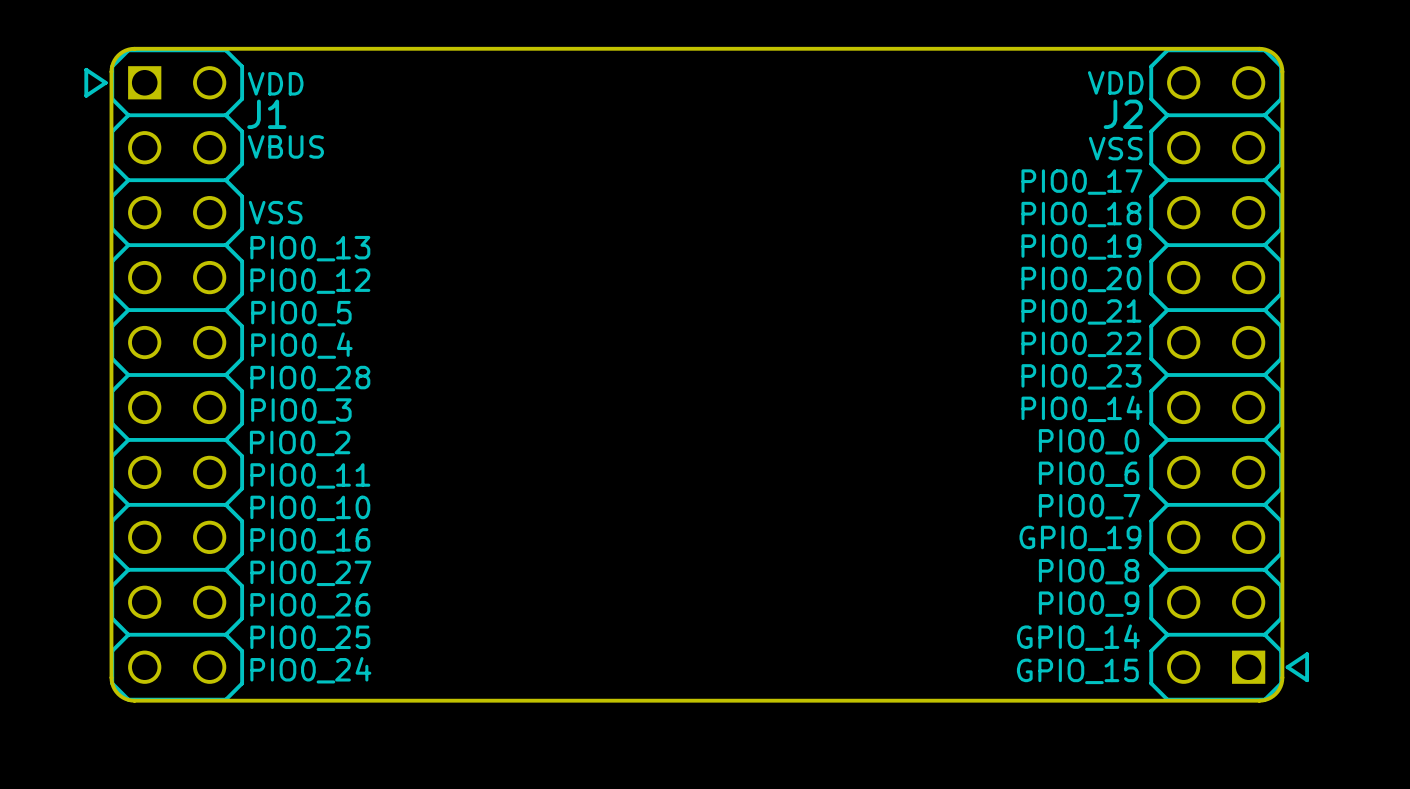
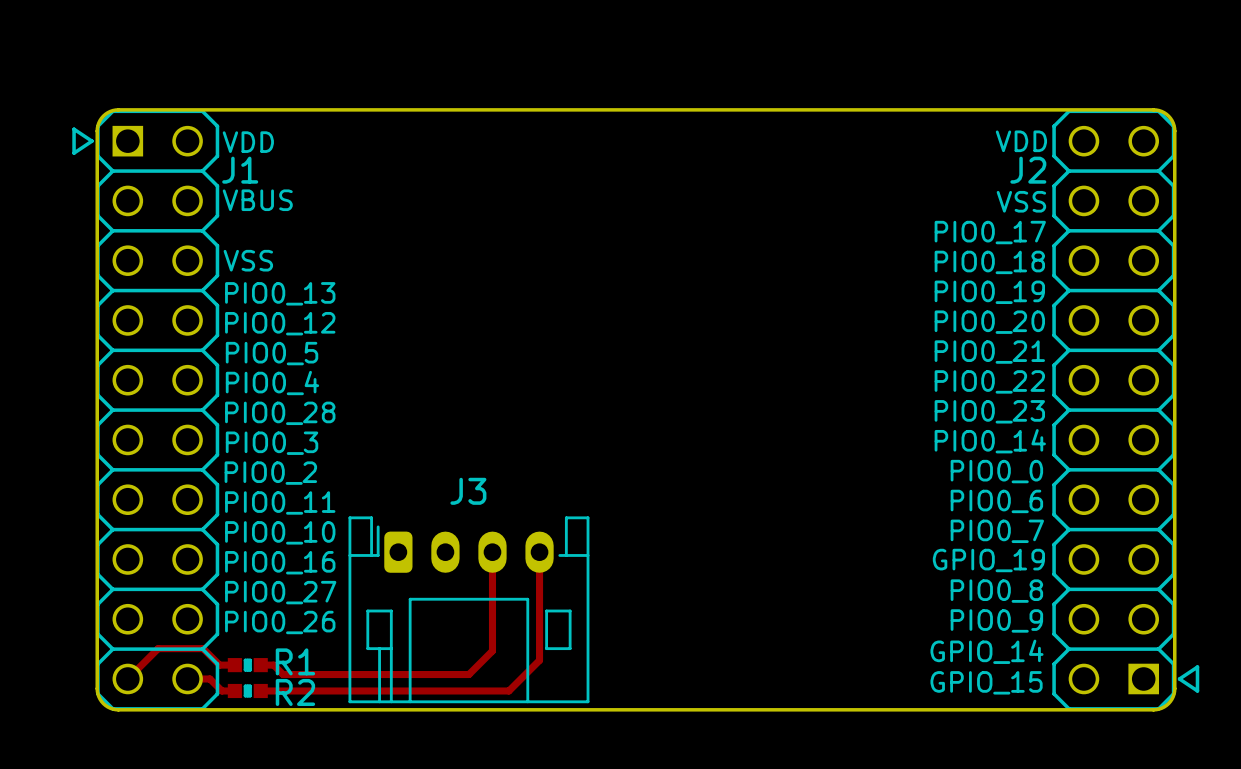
track: none -> (492, 552) (492, 650) (468, 674) (283, 674) (273, 665) (260, 665)
track: none -> (539, 552) (539, 660) (508, 690) (260, 690)
J3: none -> (468, 609)
text: PIO0_25 (310, 638) -> none
track: none -> (234, 665) (219, 665) (203, 648) (158, 648) (127, 678)
R1: none -> (247, 665)
track: none -> (187, 678) (209, 678) (221, 690) (234, 690)
text: PIO0_24 (310, 670) -> none
R2: none -> (247, 690)

